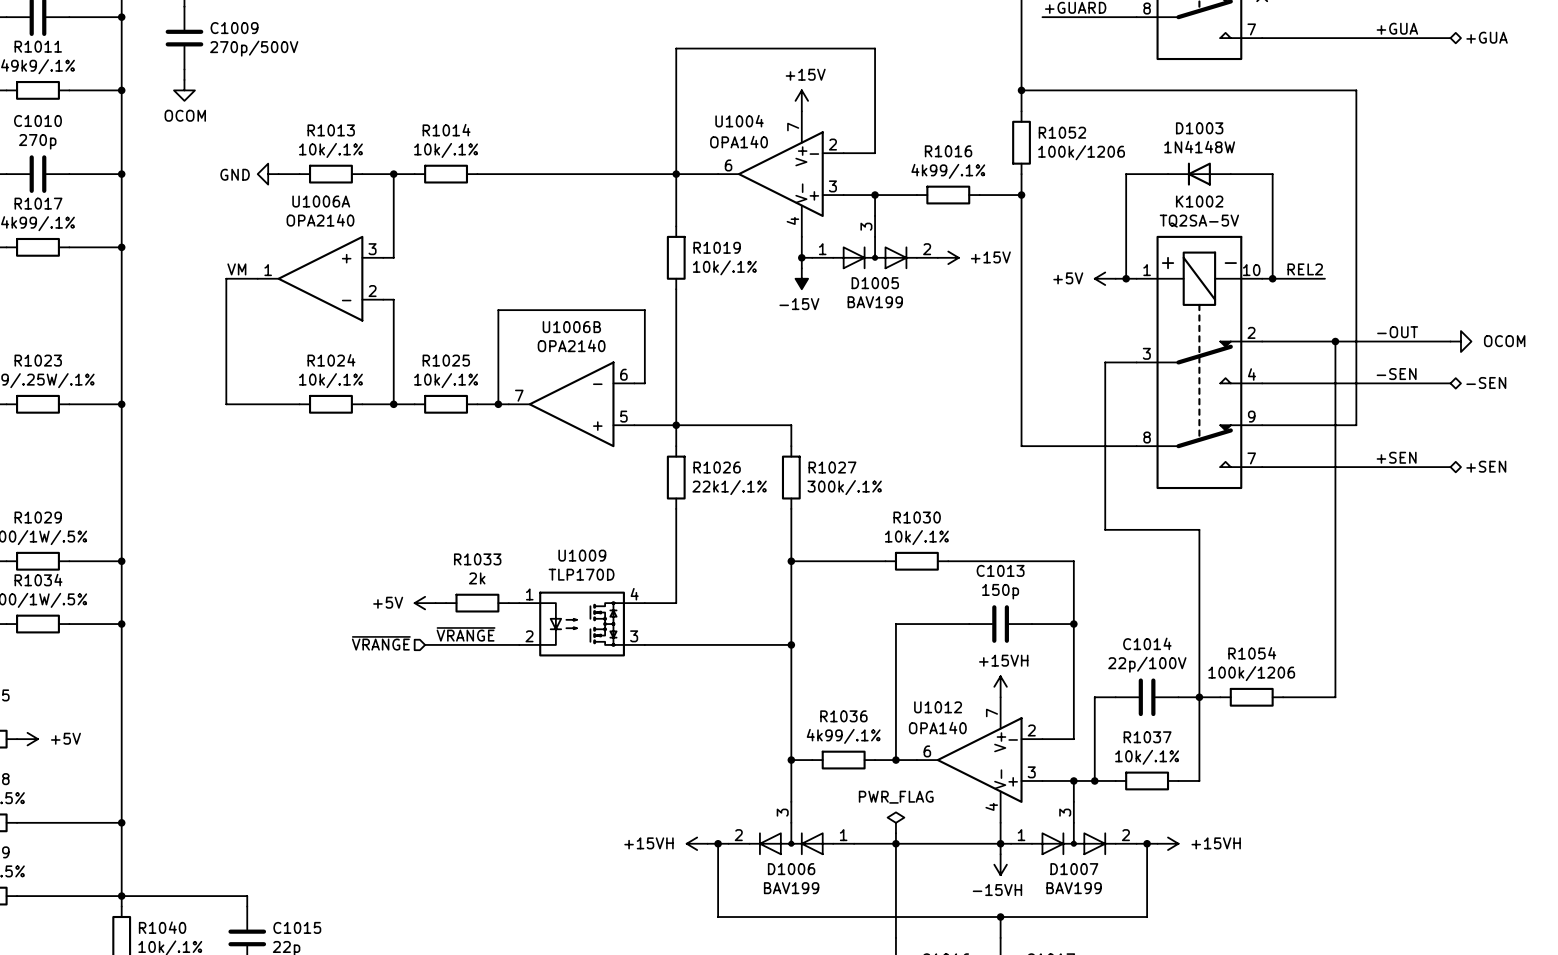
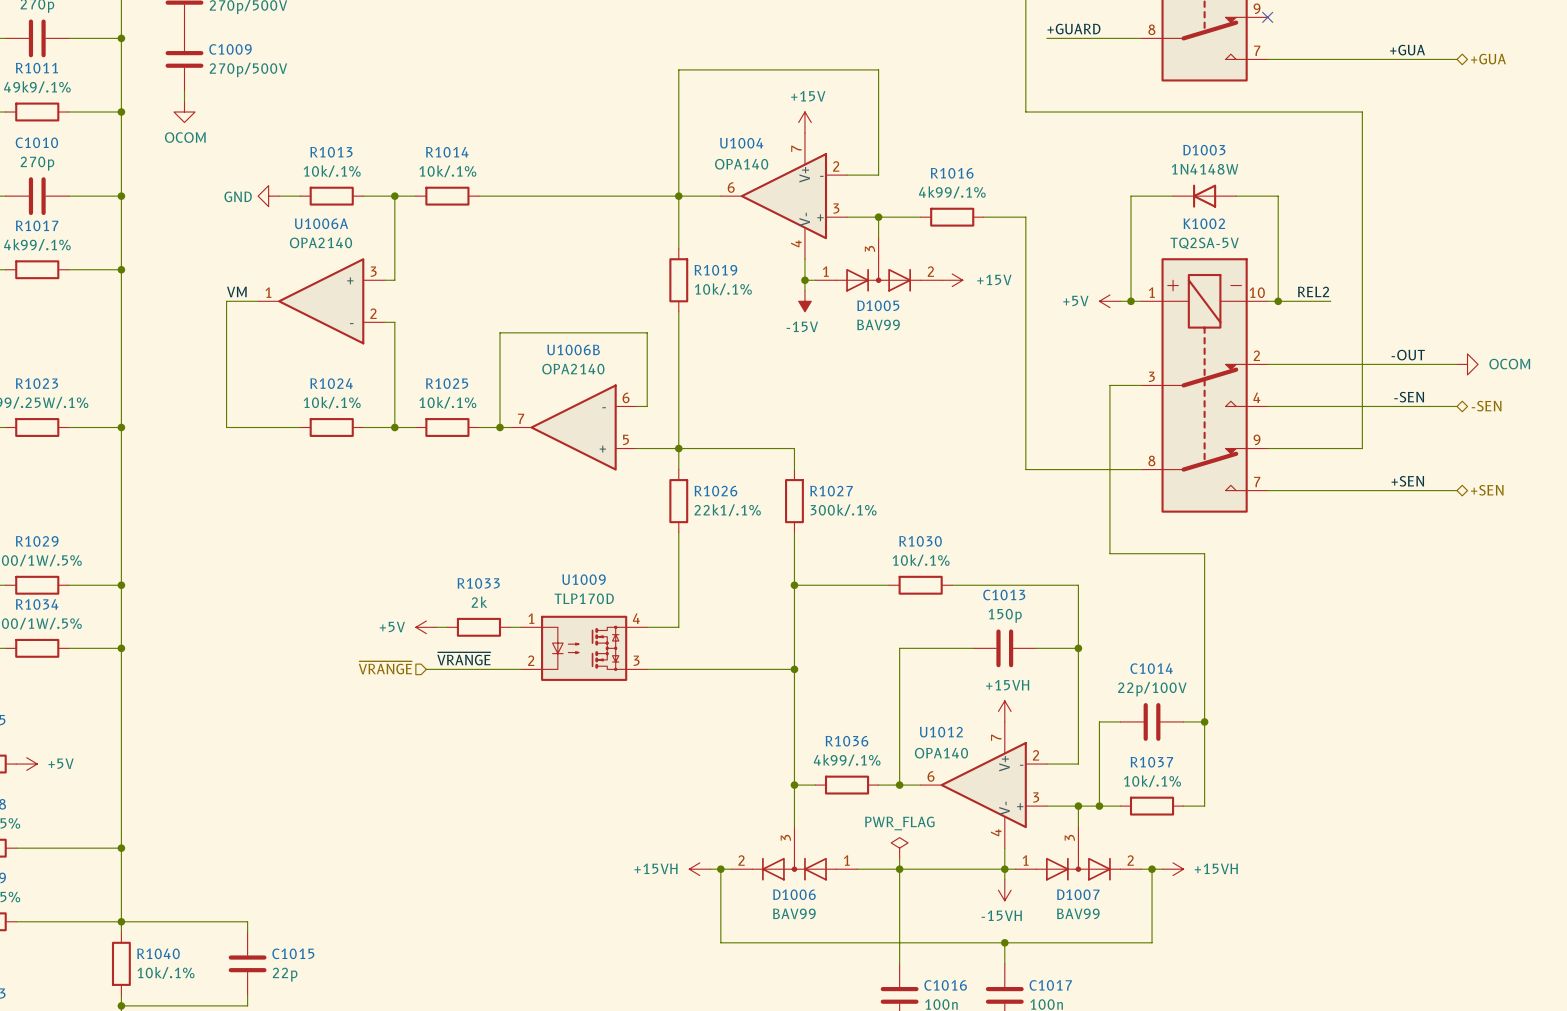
wire: (1021, 90) (1021, 111) -> none
junction: (1021, 90) -> none
R1052: 100k/1206 (1021, 142) -> none
wire: (1021, 174) (1021, 195) -> none
junction: (1021, 195) -> none
D1005 value: BAV199 (875, 302) -> BAV99 (878, 324)
wire: (1335, 341) (1335, 697) (1283, 697) -> none
junction: (1335, 341) -> none
wire: (1199, 697) (1220, 697) -> none
R1054: 100k/1206 (1251, 697) -> none
D1006 value: BAV199 (791, 888) -> BAV99 (794, 913)
D1007 value: BAV199 (1074, 888) -> BAV99 (1078, 913)

